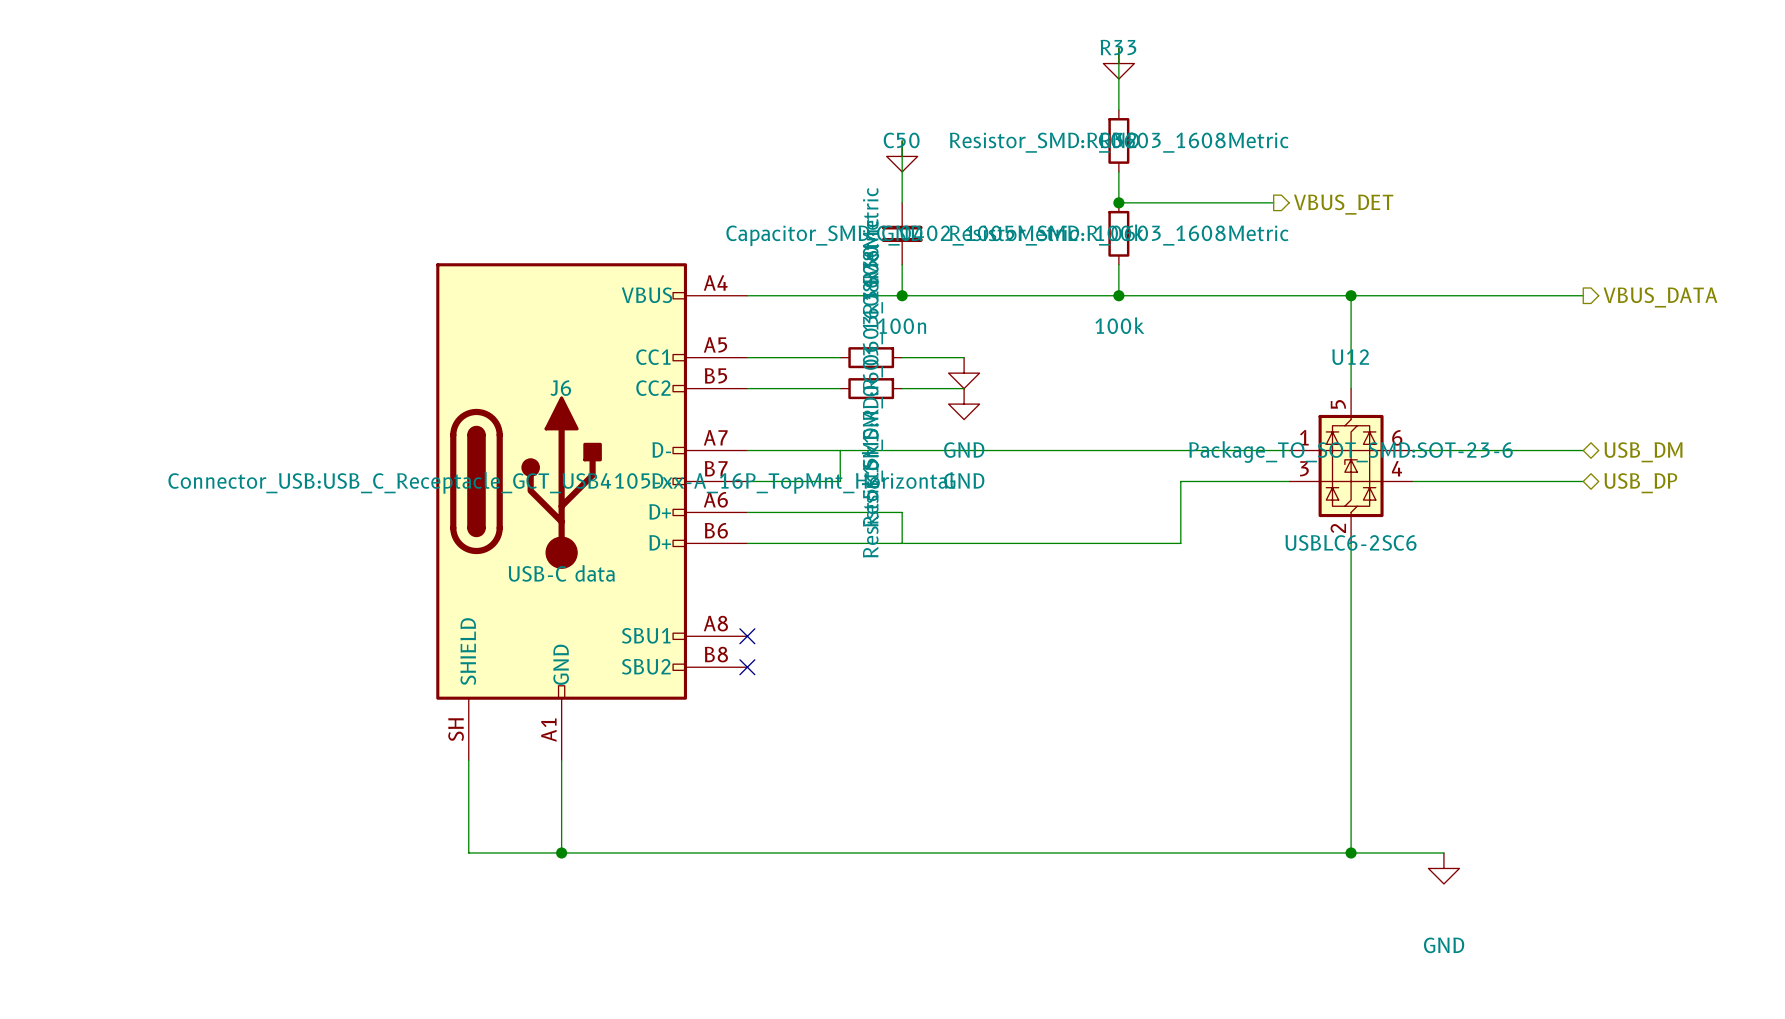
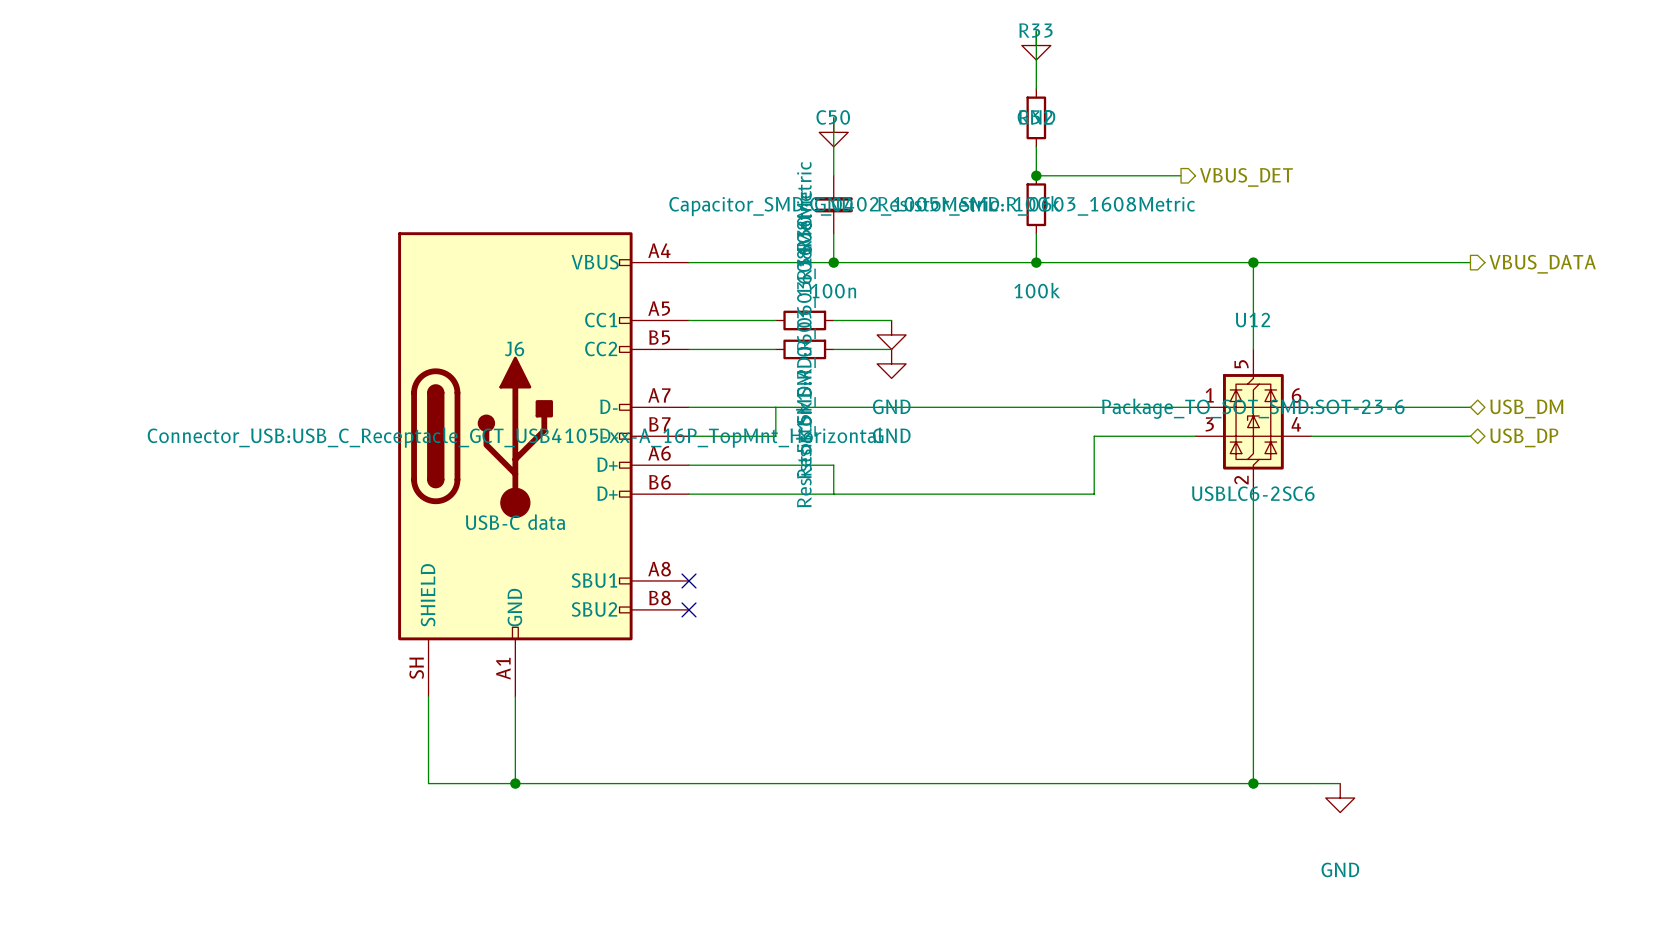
R33 text: Resistor_SMD:R_0603_1608Metric (1119, 142) -> none

